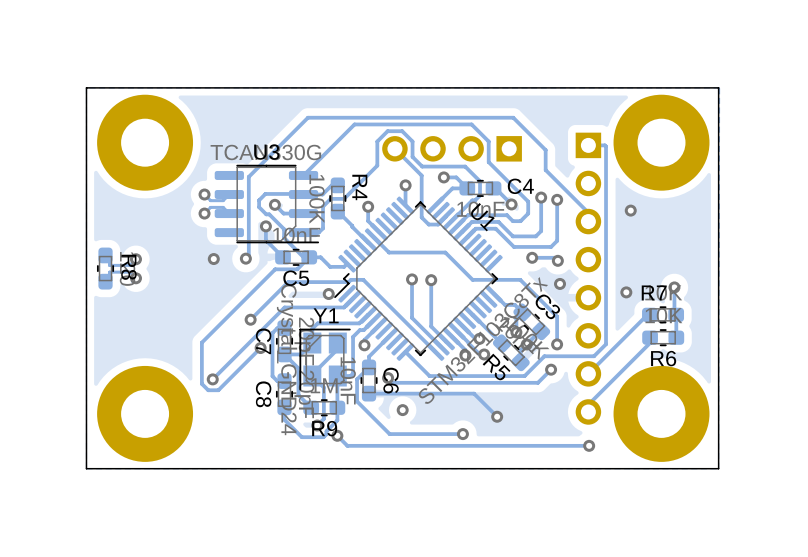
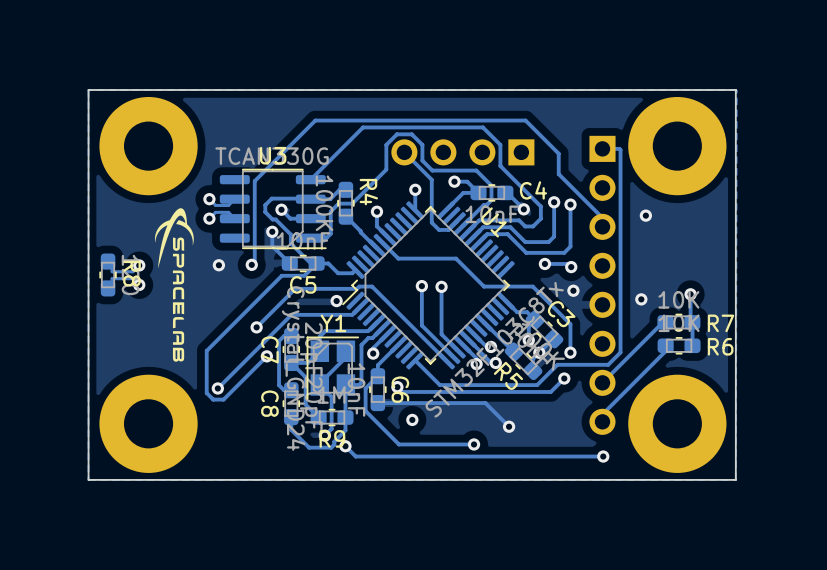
drawing: none -> [155, 208, 194, 362]
R7 name position: R7 (654, 292) -> R7 (720, 323)
R6 name position: R6 (663, 358) -> R6 (720, 346)

